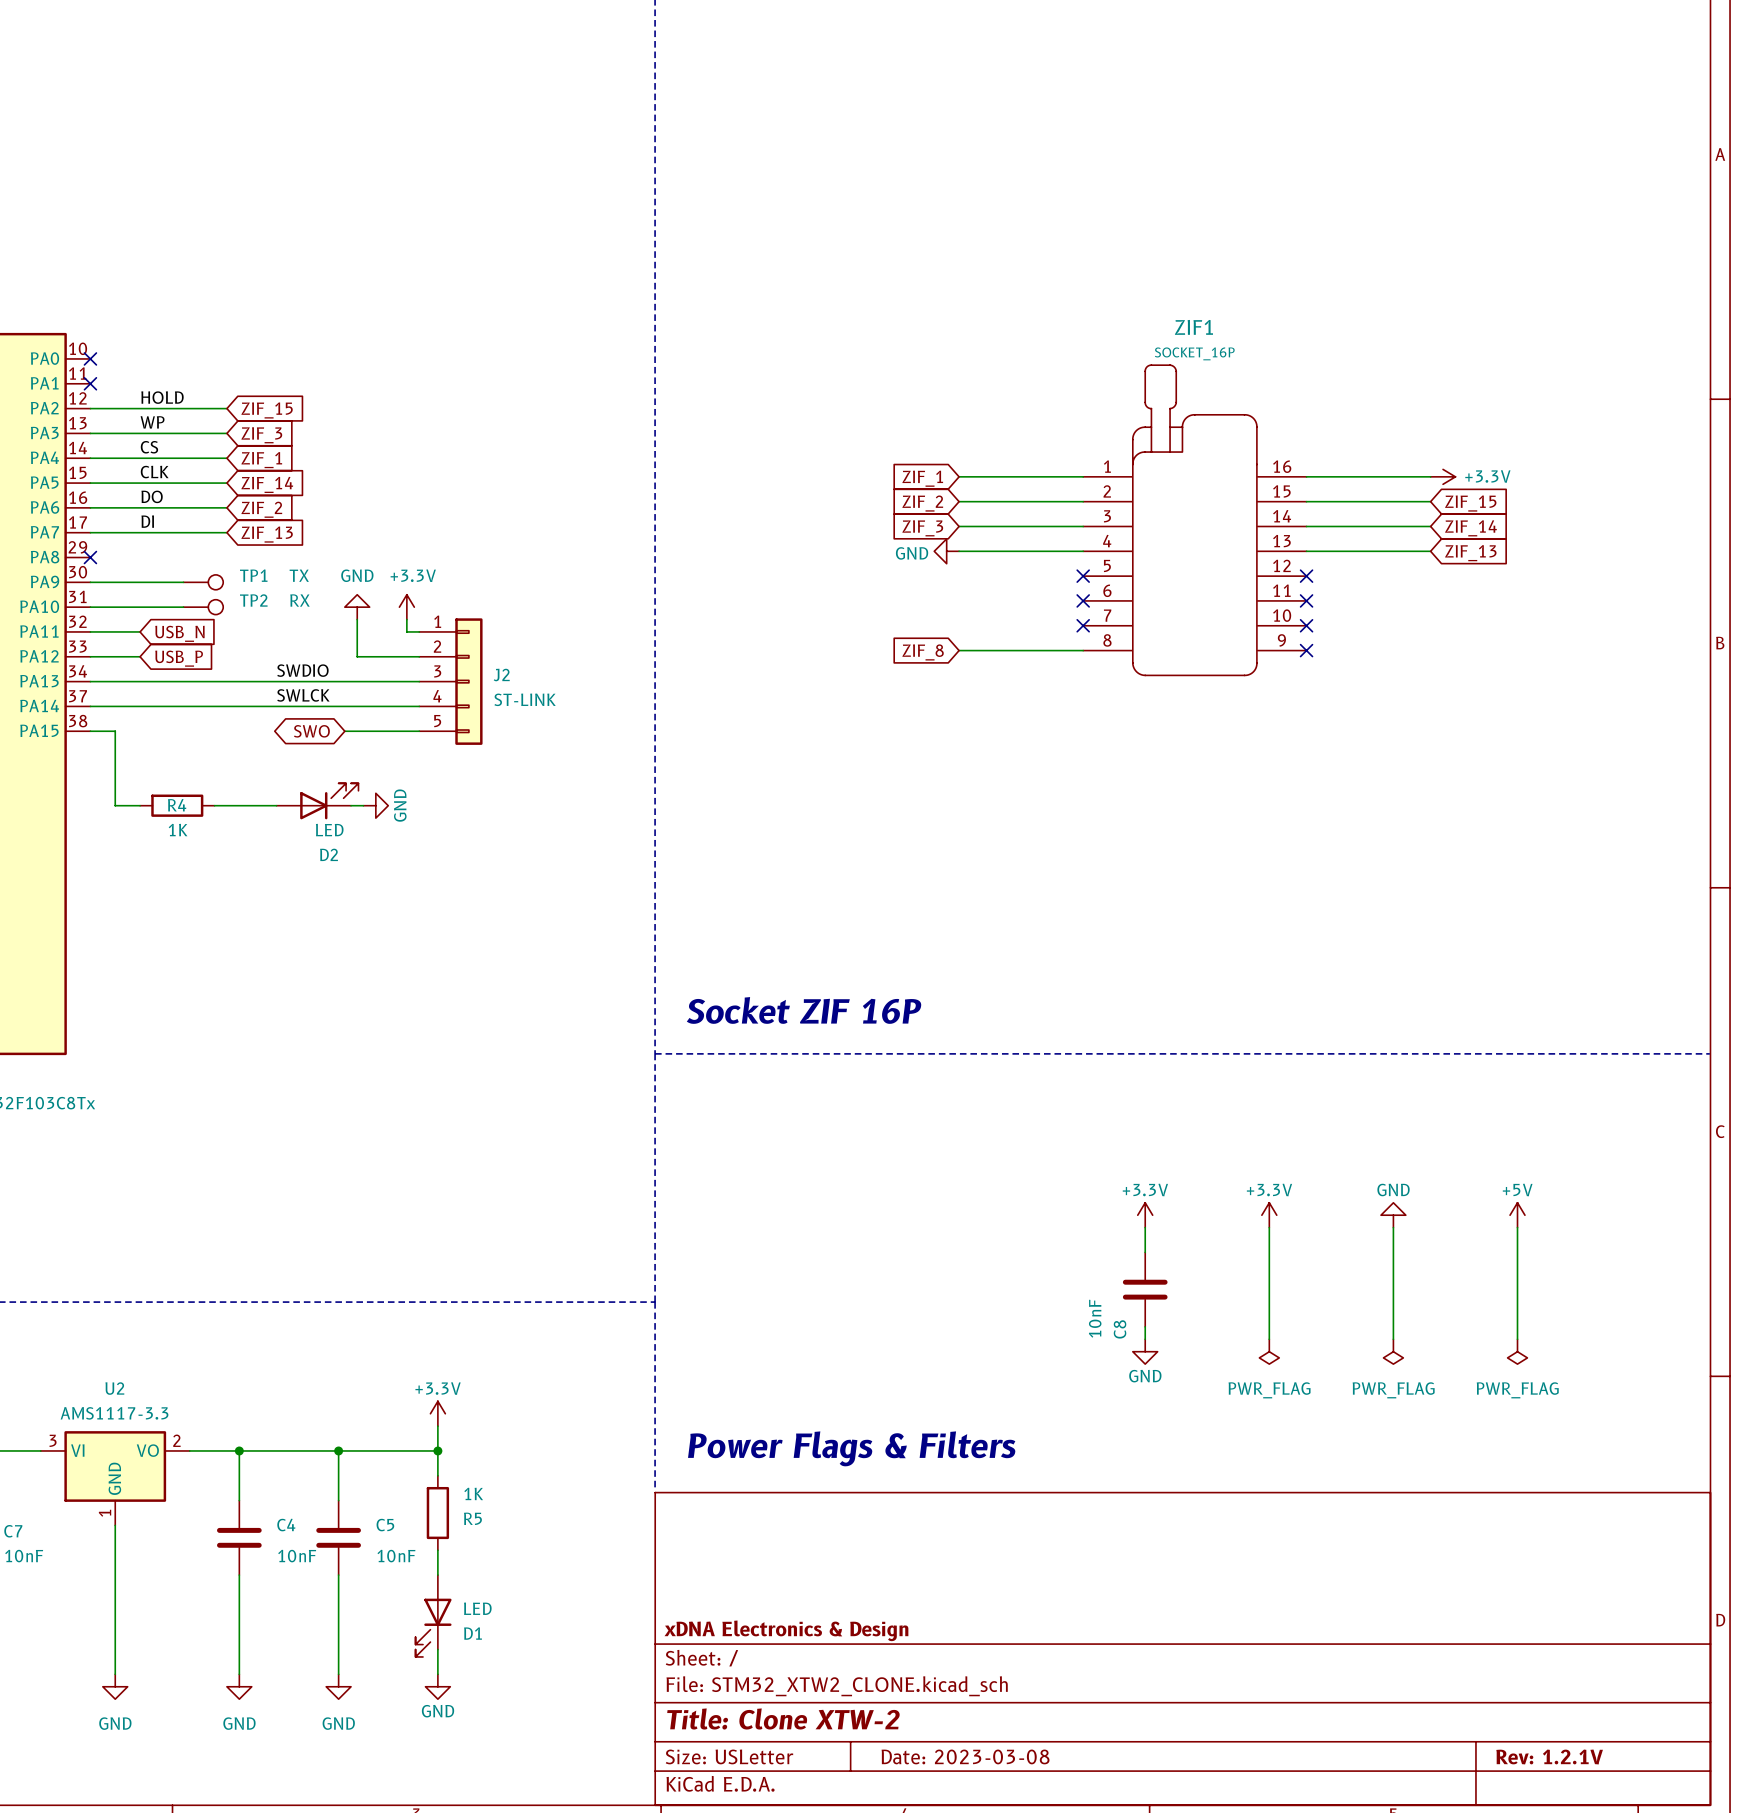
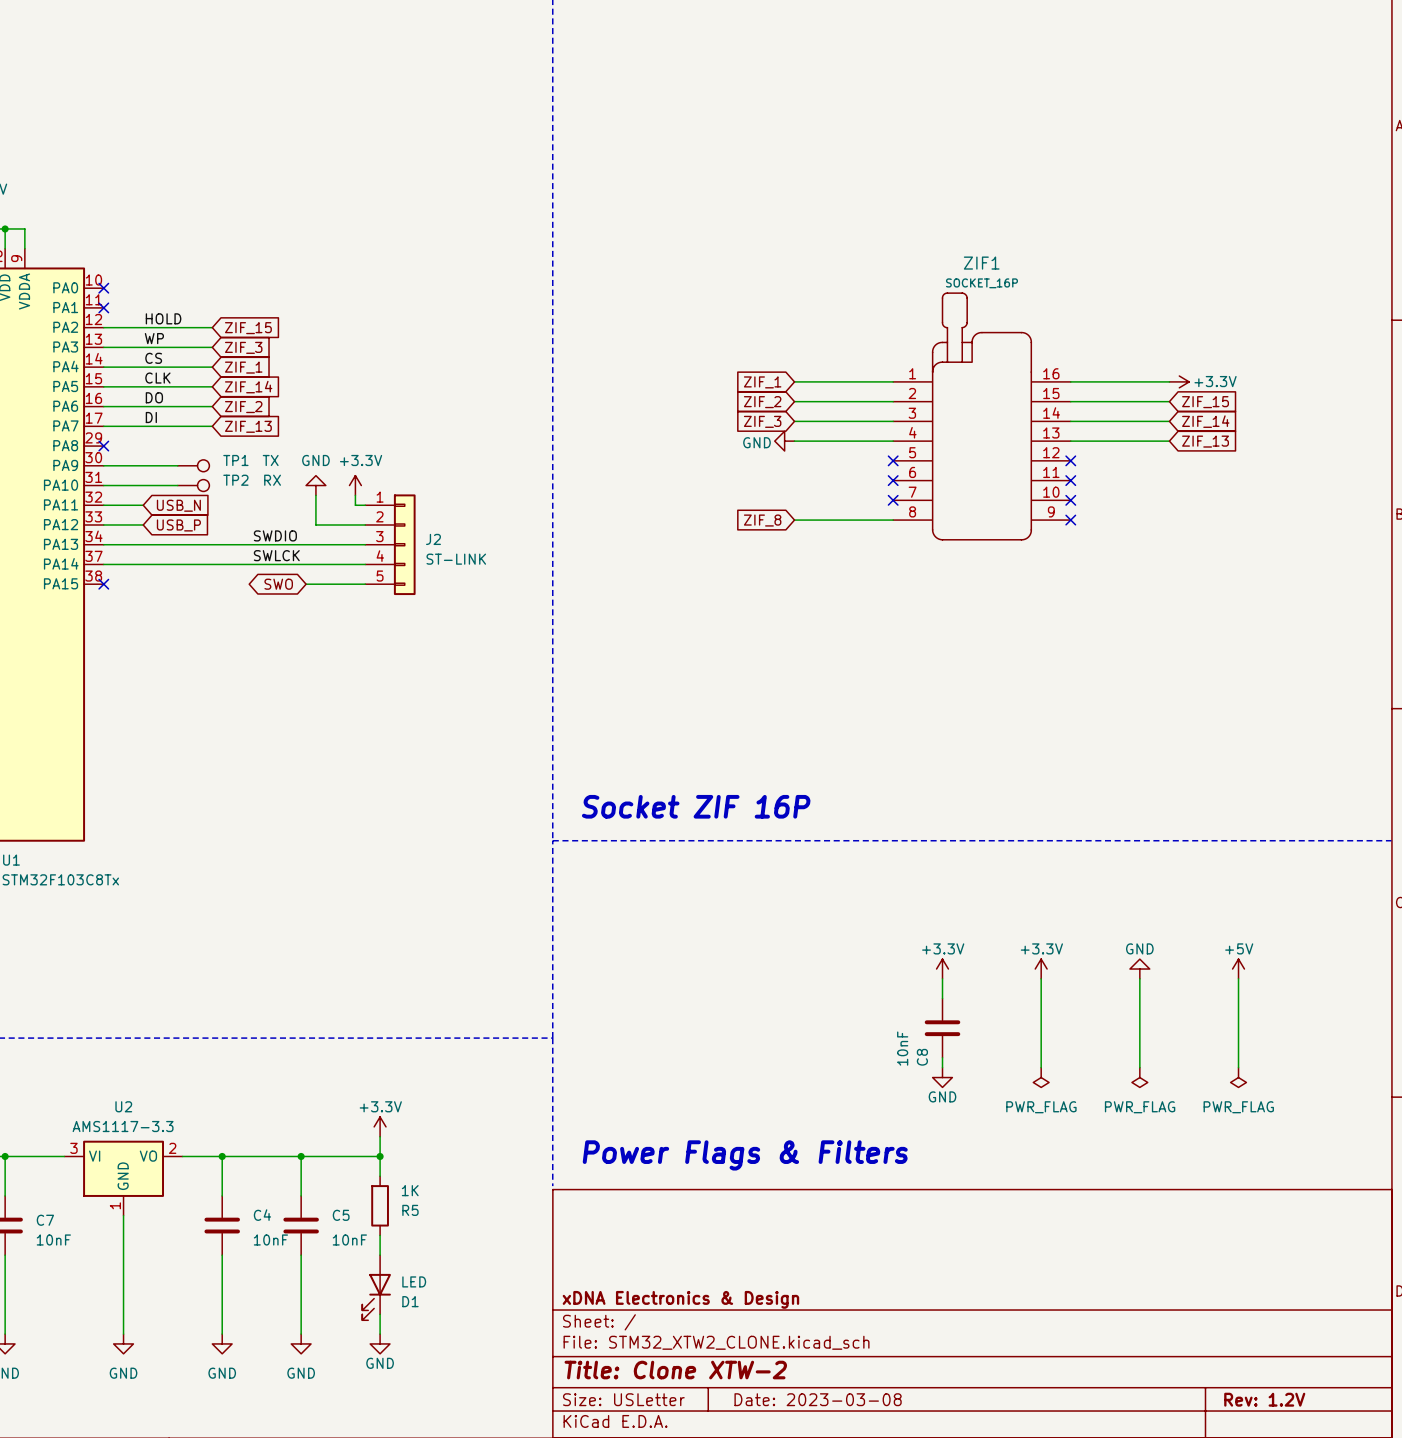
wire: (90, 731) (115, 731) (115, 805) (140, 805) -> none
no-connect mark: none -> (103, 584)
D2: LED (317, 801) -> none
R4: 1K (177, 805) -> none
wire: (214, 805) (276, 805) -> none
wire: (351, 805) (363, 805) -> none
power symbol: GND (375, 805) -> none
title block: Rev: 1.2.1V (1549, 1756) -> Rev: 1.2V (1264, 1399)

